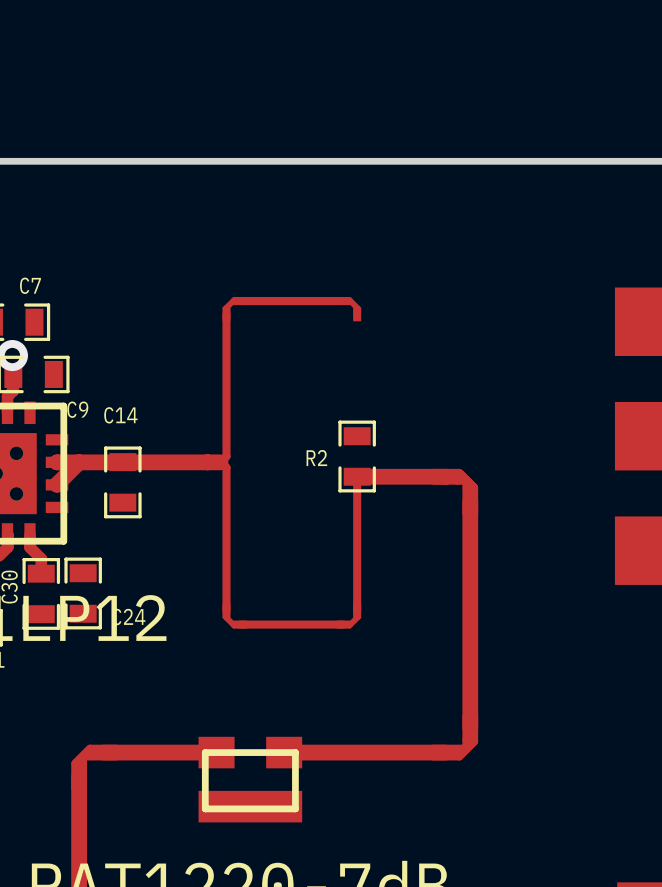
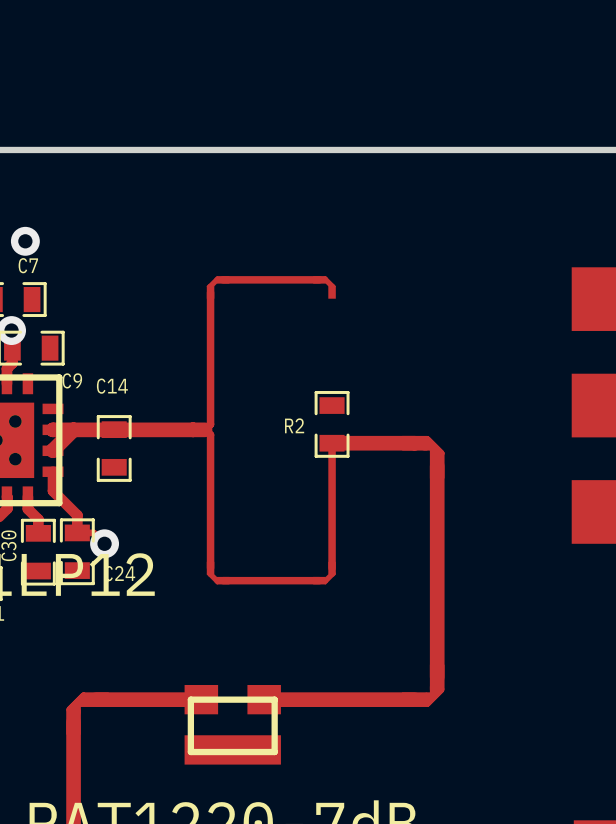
via: none -> (25, 241)
track: none -> (53, 471) (53, 491) (77, 515) (77, 532) (93, 532) (104, 543)
via: none -> (104, 543)

